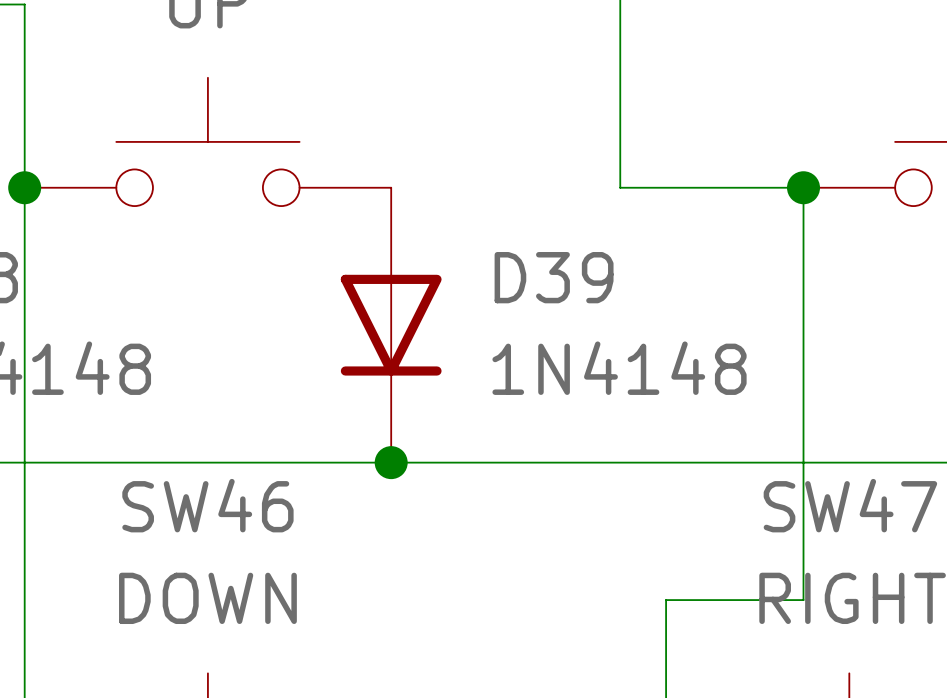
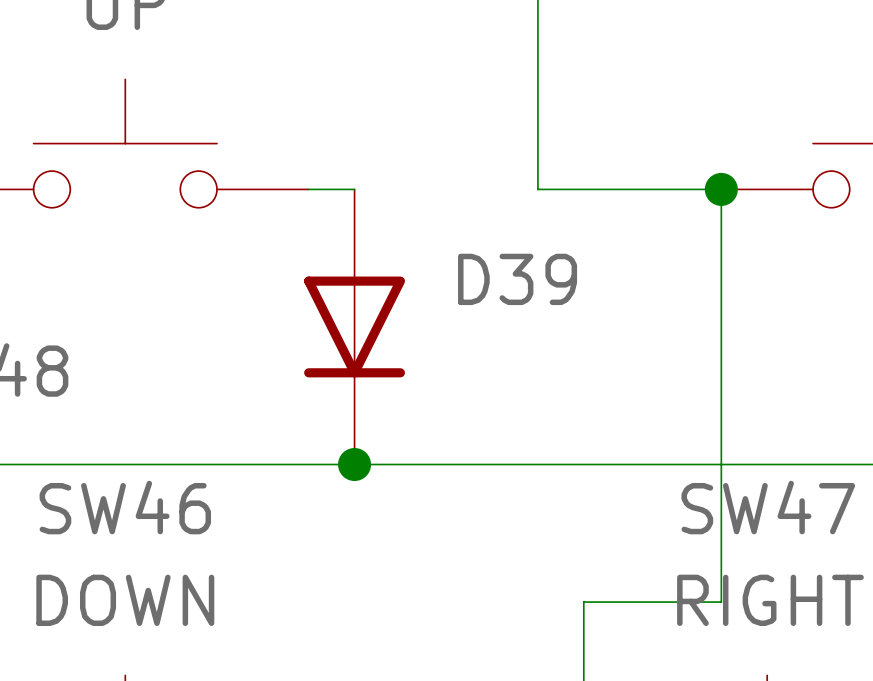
wire: none -> (308, 189) (354, 189)
D39 position: (391, 325) -> (354, 326)
D39 value: 1N4148 (619, 368) -> none
junction position: (391, 462) -> (354, 464)

